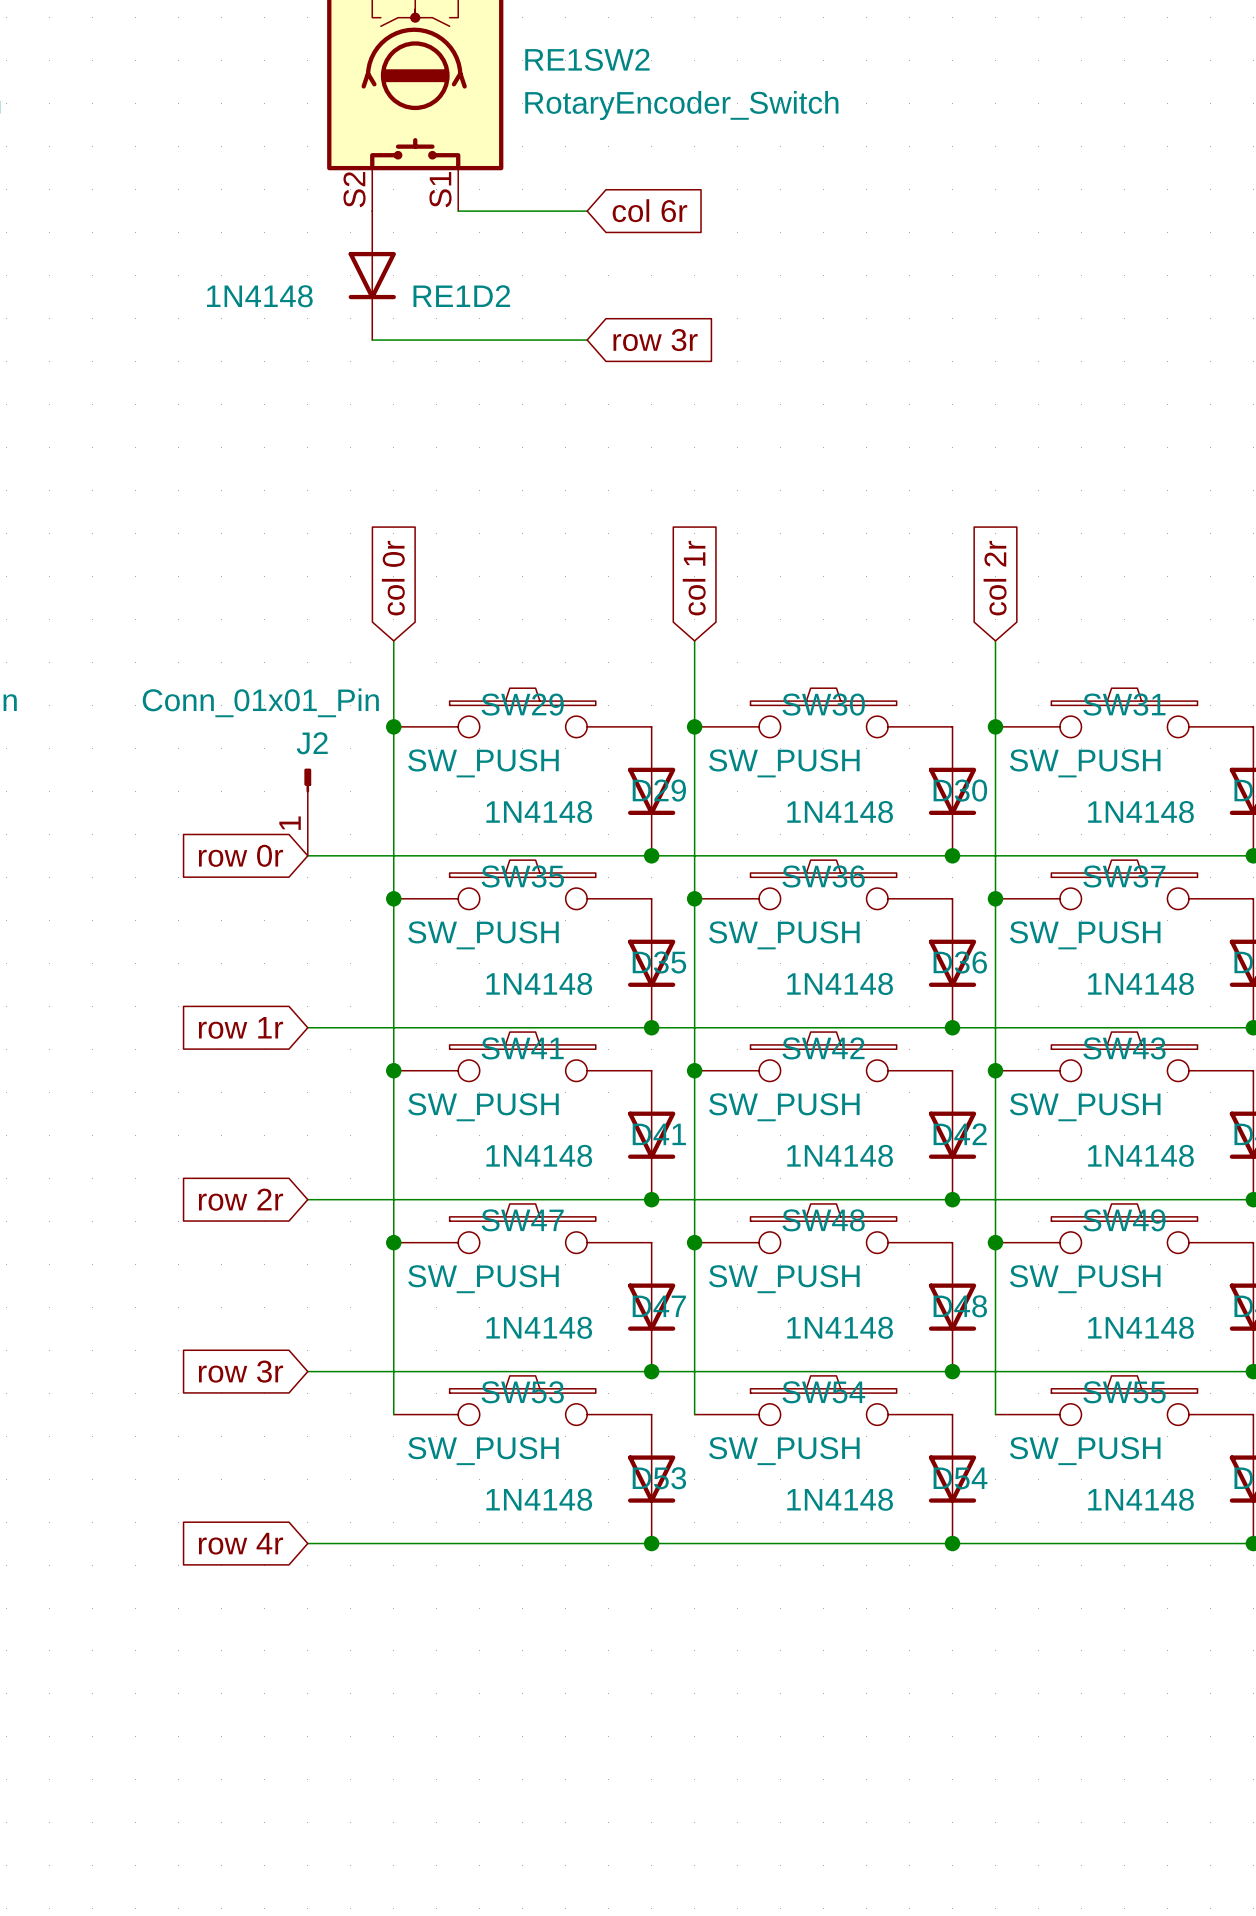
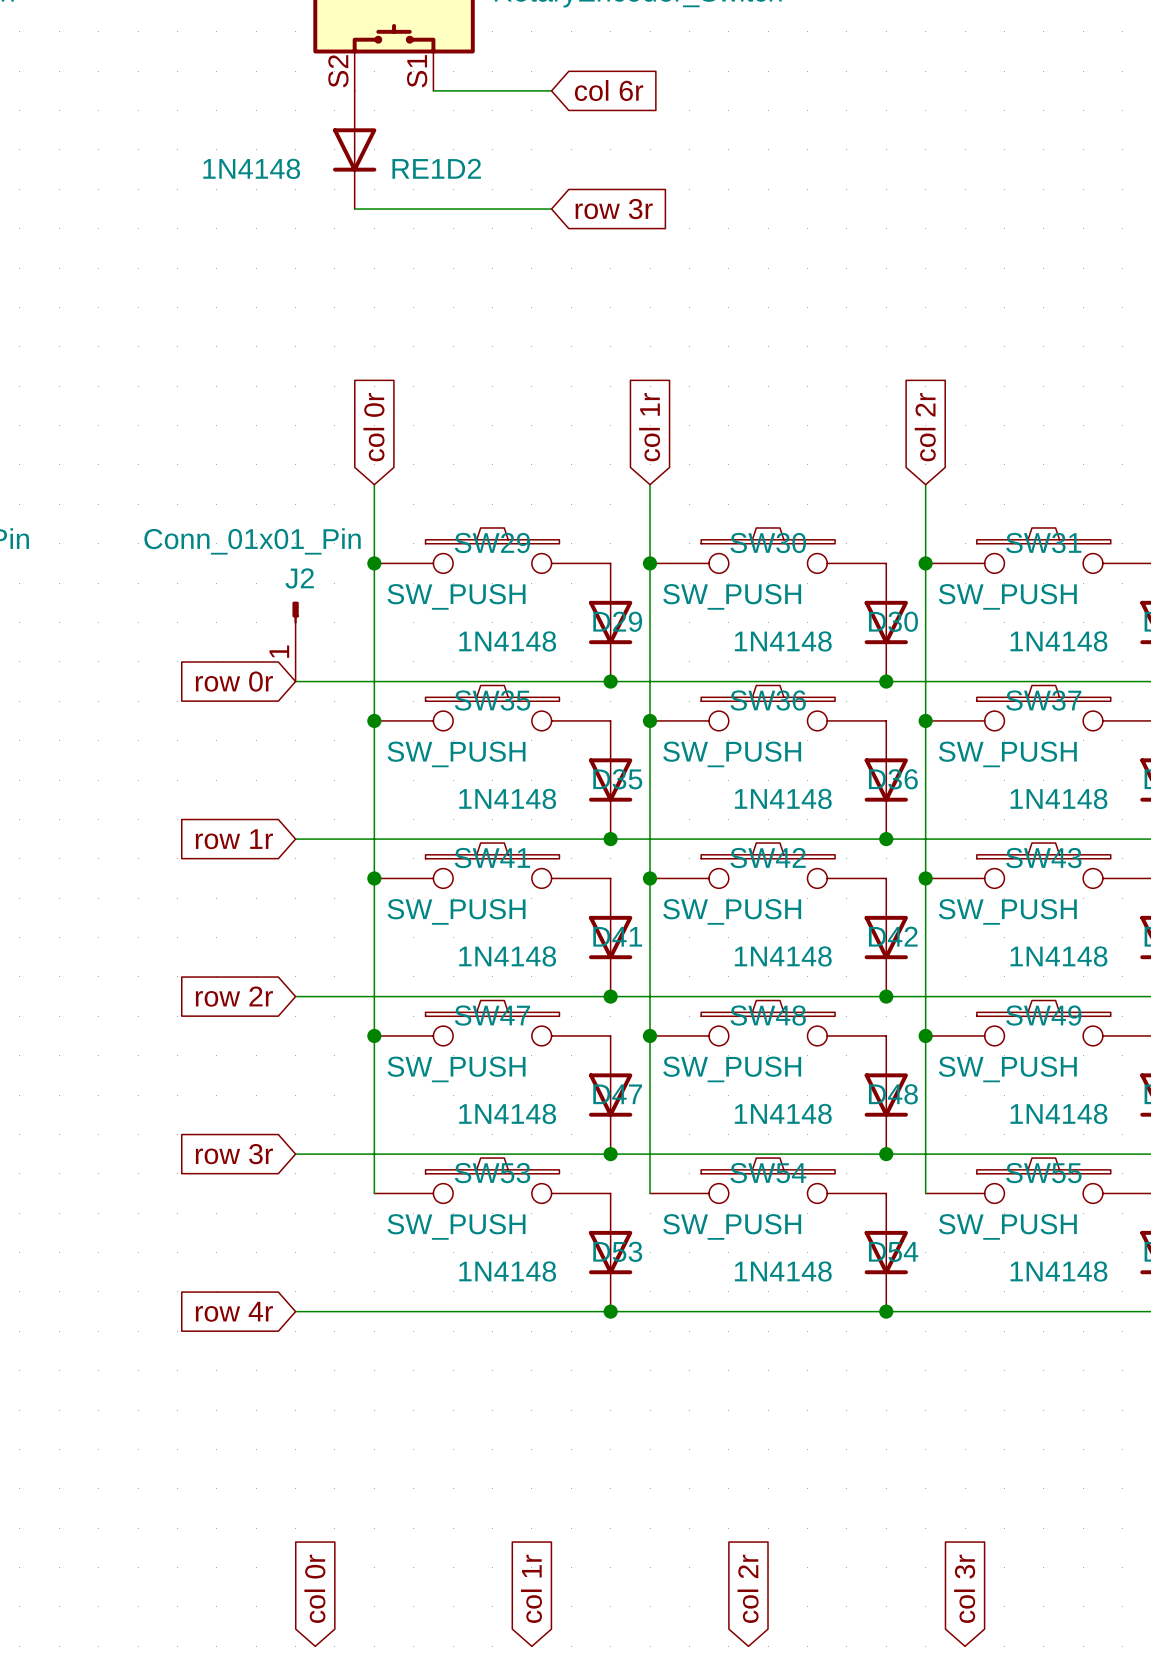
global label: none -> col 0r (314, 1588)
global label: none -> col 1r (531, 1588)
global label: none -> col 2r (748, 1588)
global label: none -> col 3r (964, 1588)

